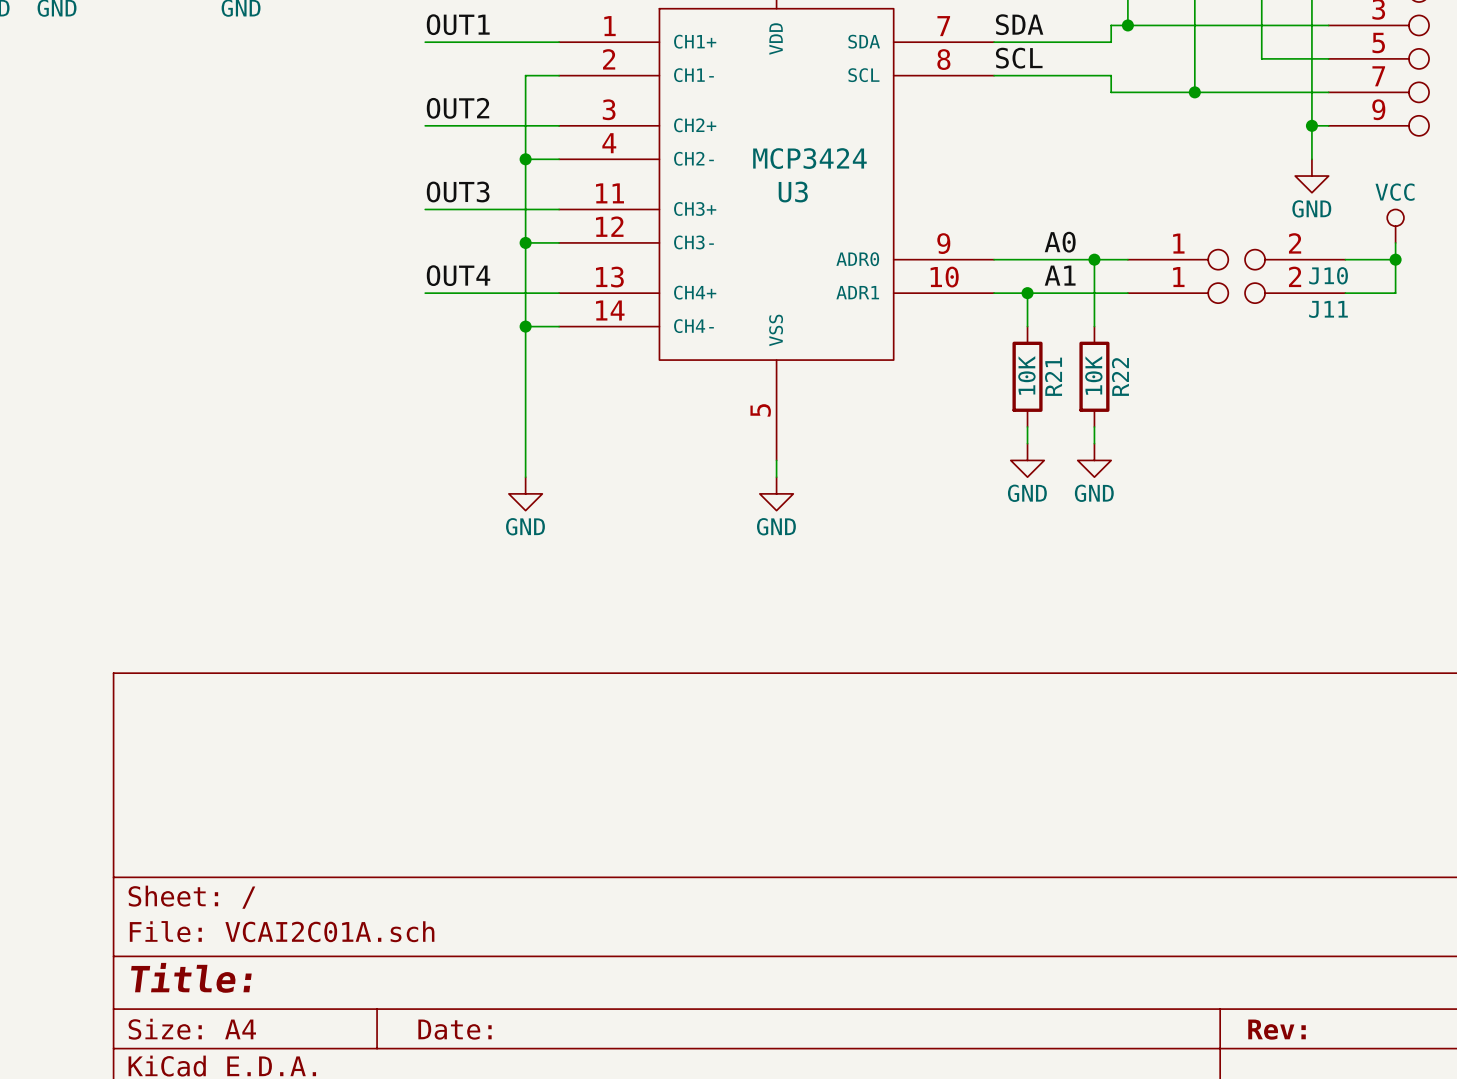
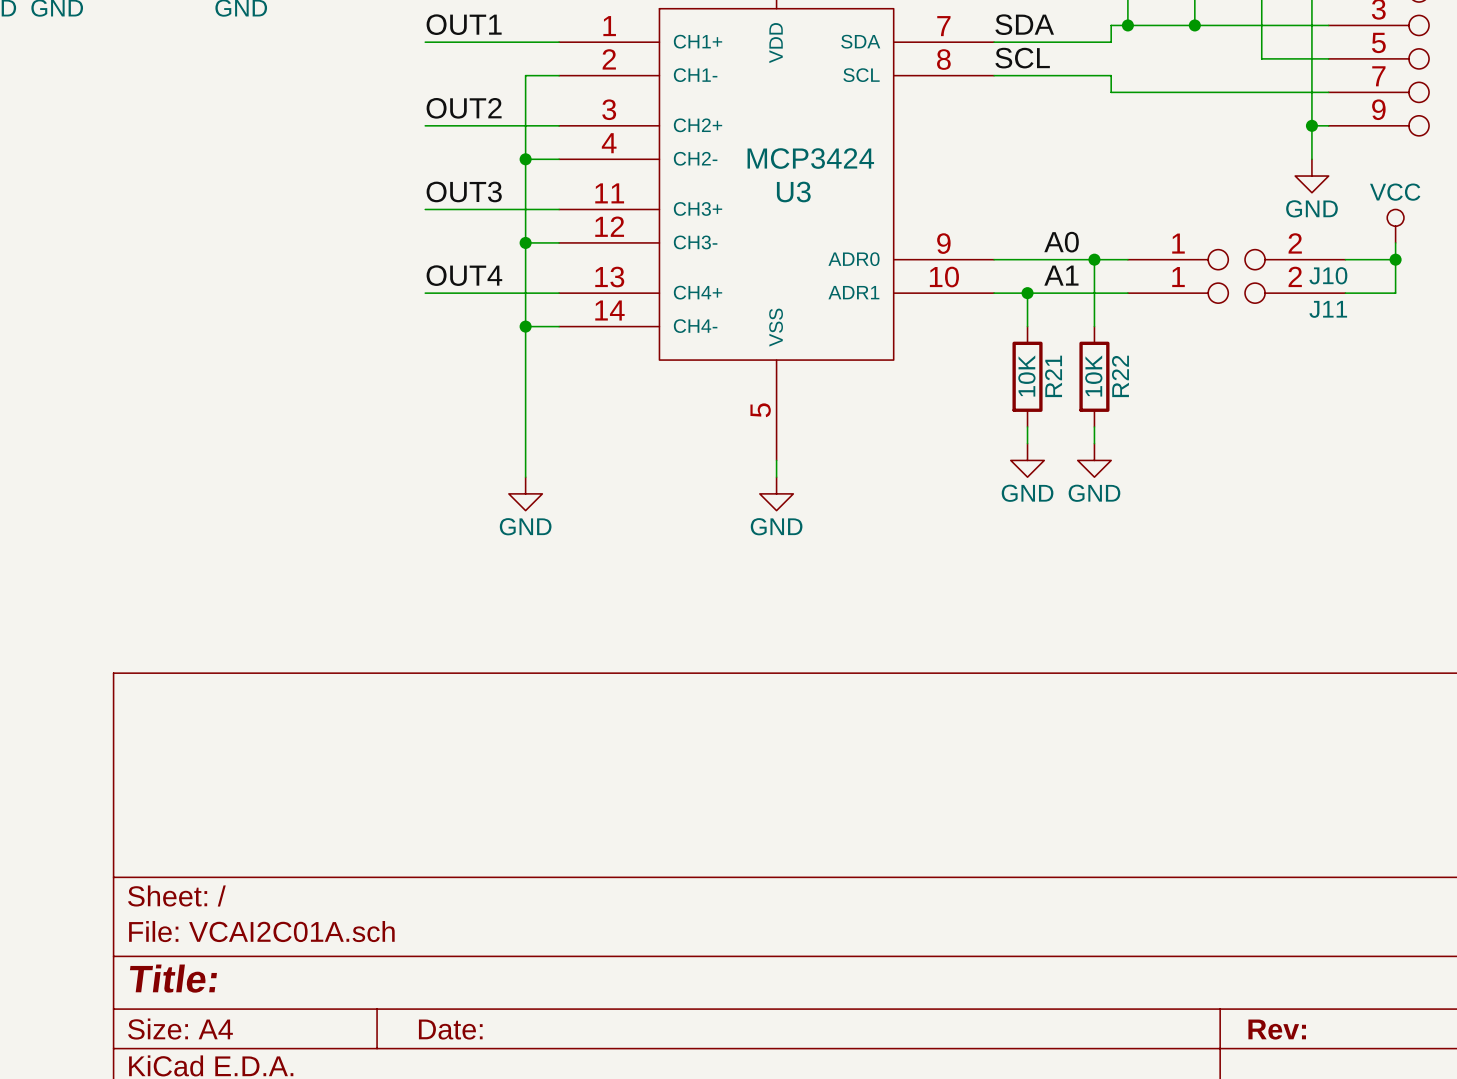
wire: (1194, 25) (1194, 92) -> none
junction position: (1194, 92) -> (1194, 25)

